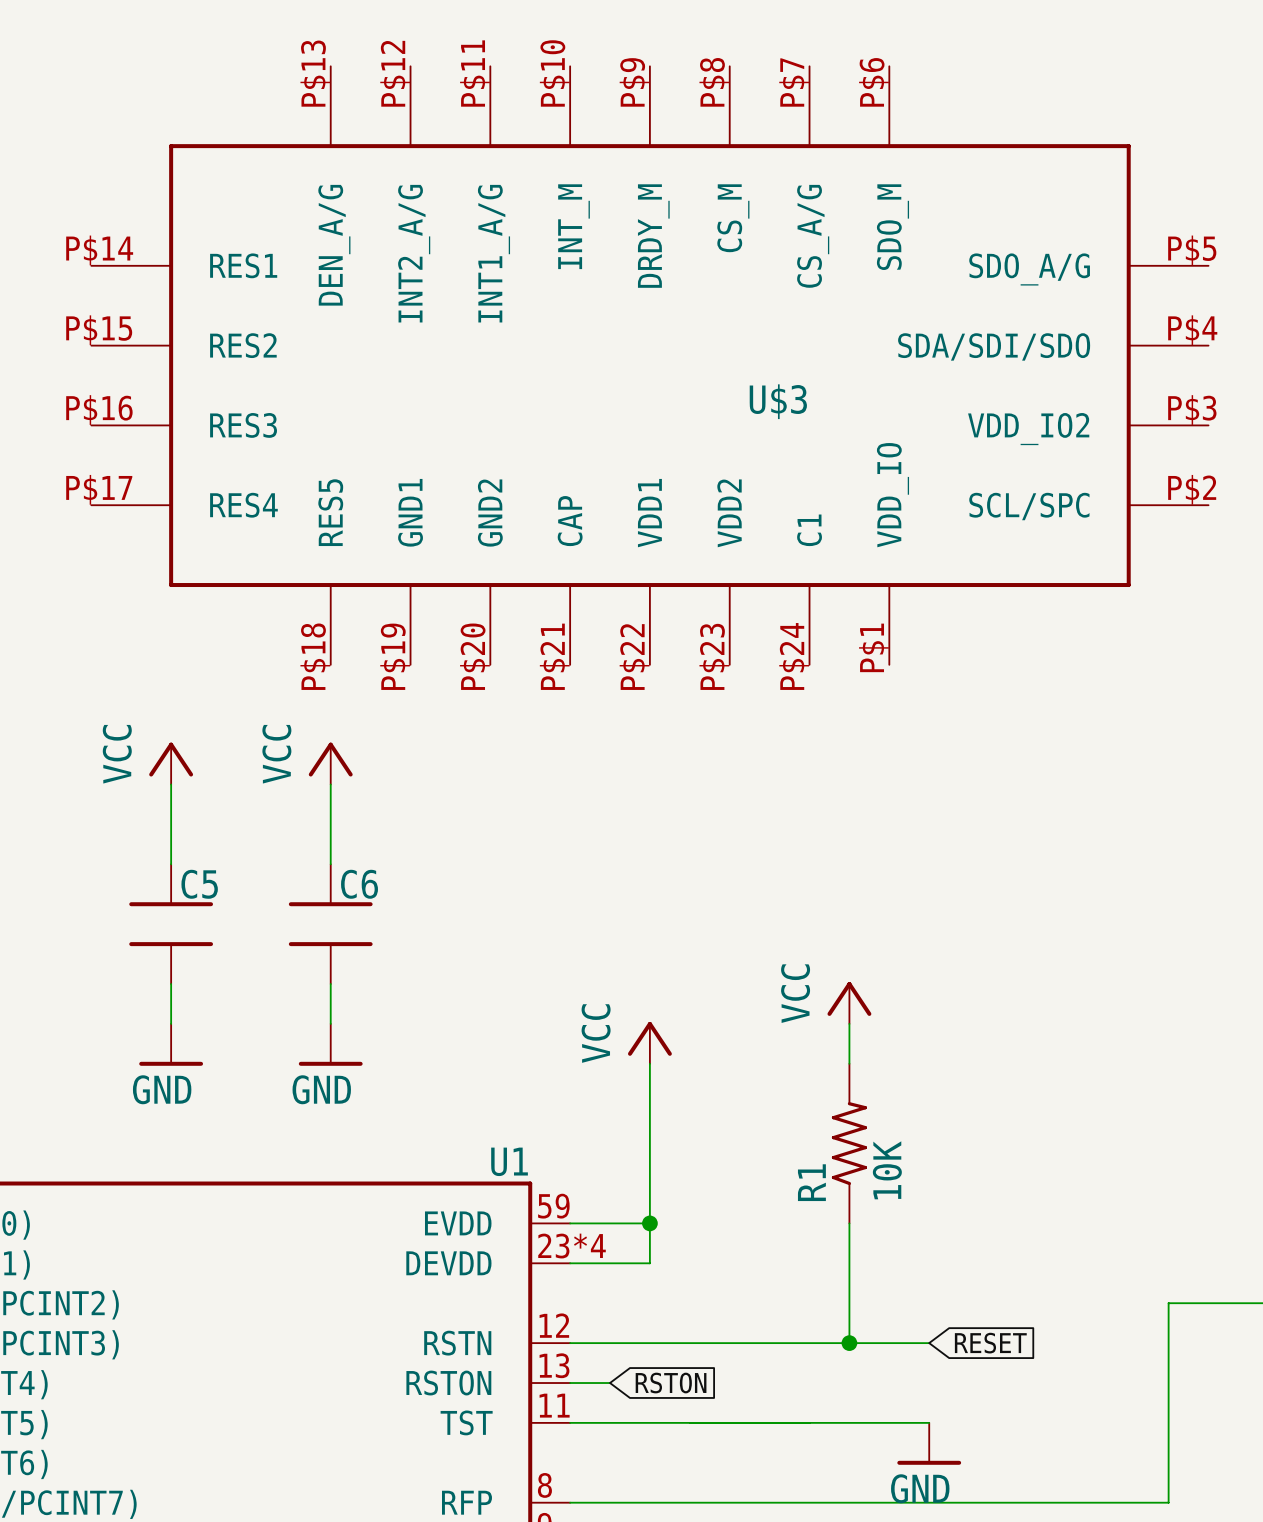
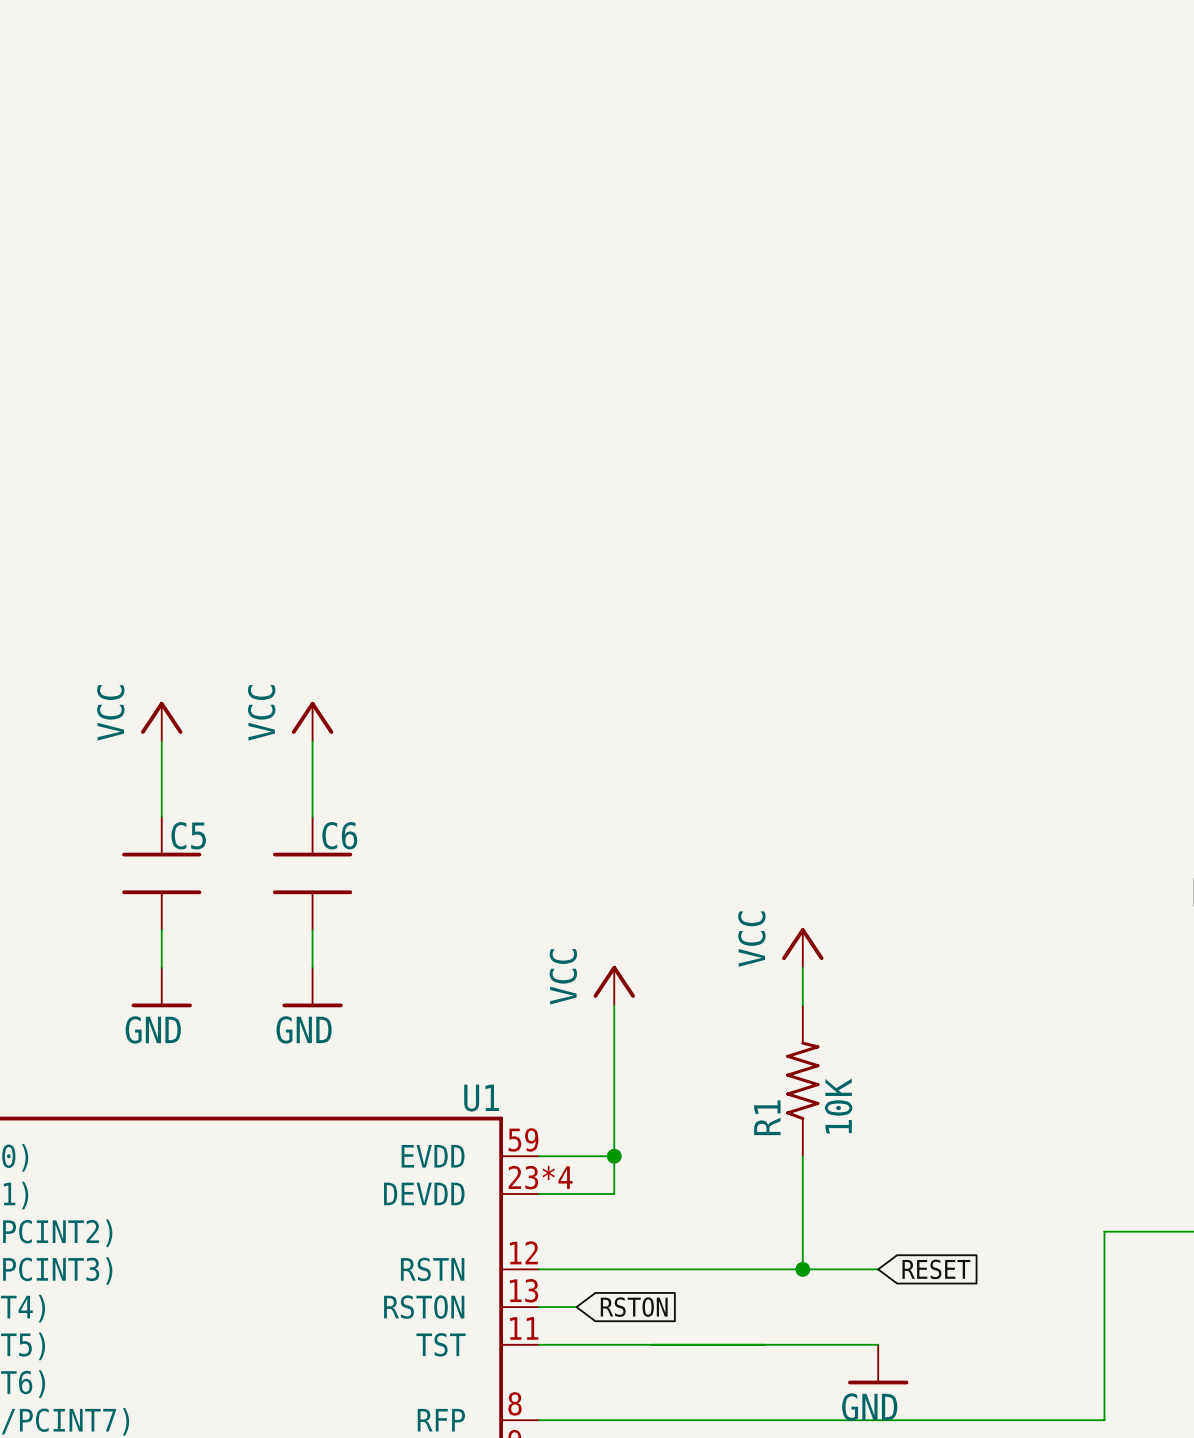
U$3: (649, 365) -> none

